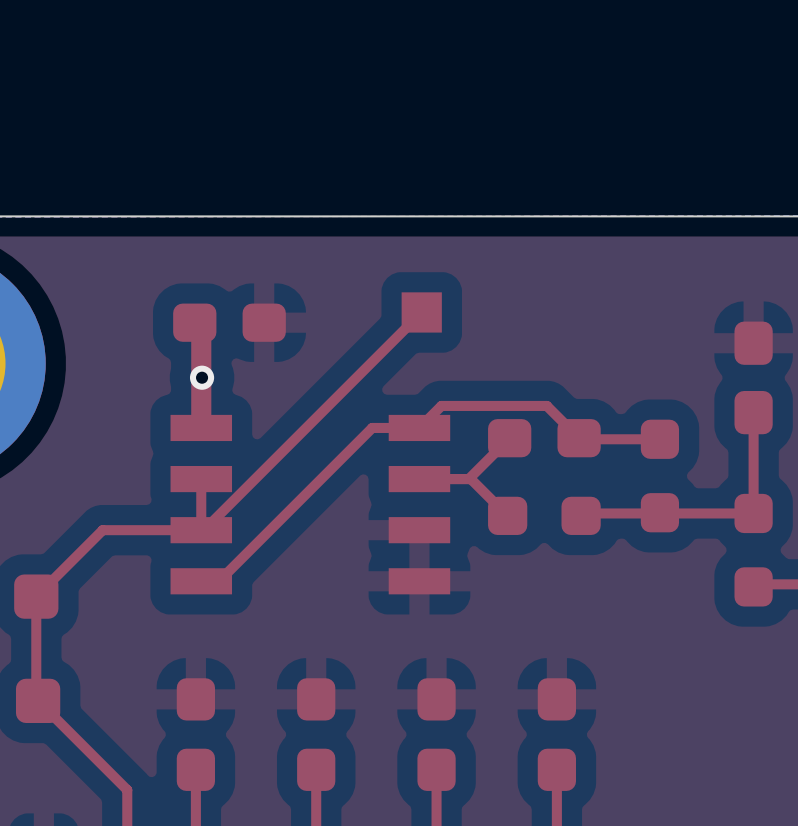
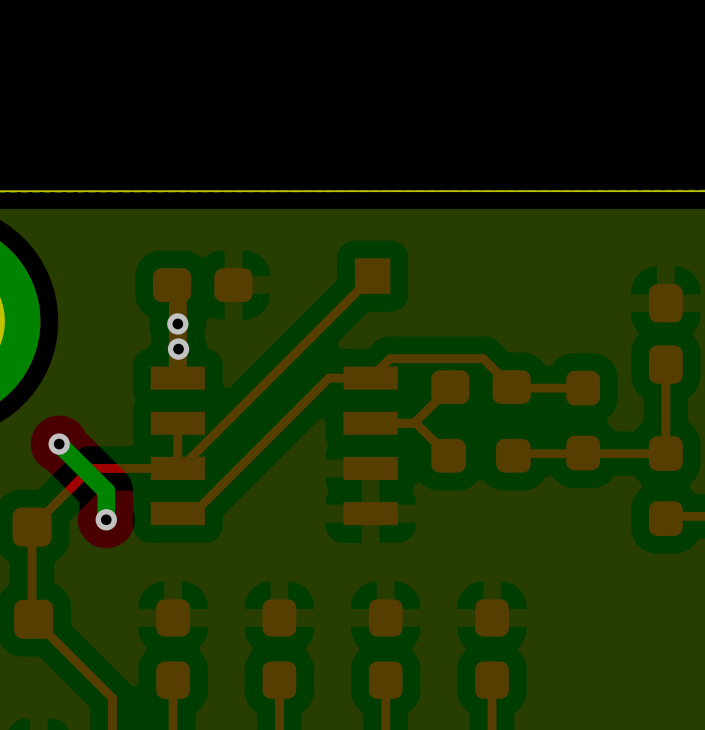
via: none -> (177, 323)
via: (202, 377) -> none
via: none -> (178, 349)
bottom track: none -> (59, 444) (106, 491) (106, 519)
via: none -> (59, 444)
via: none -> (106, 519)

